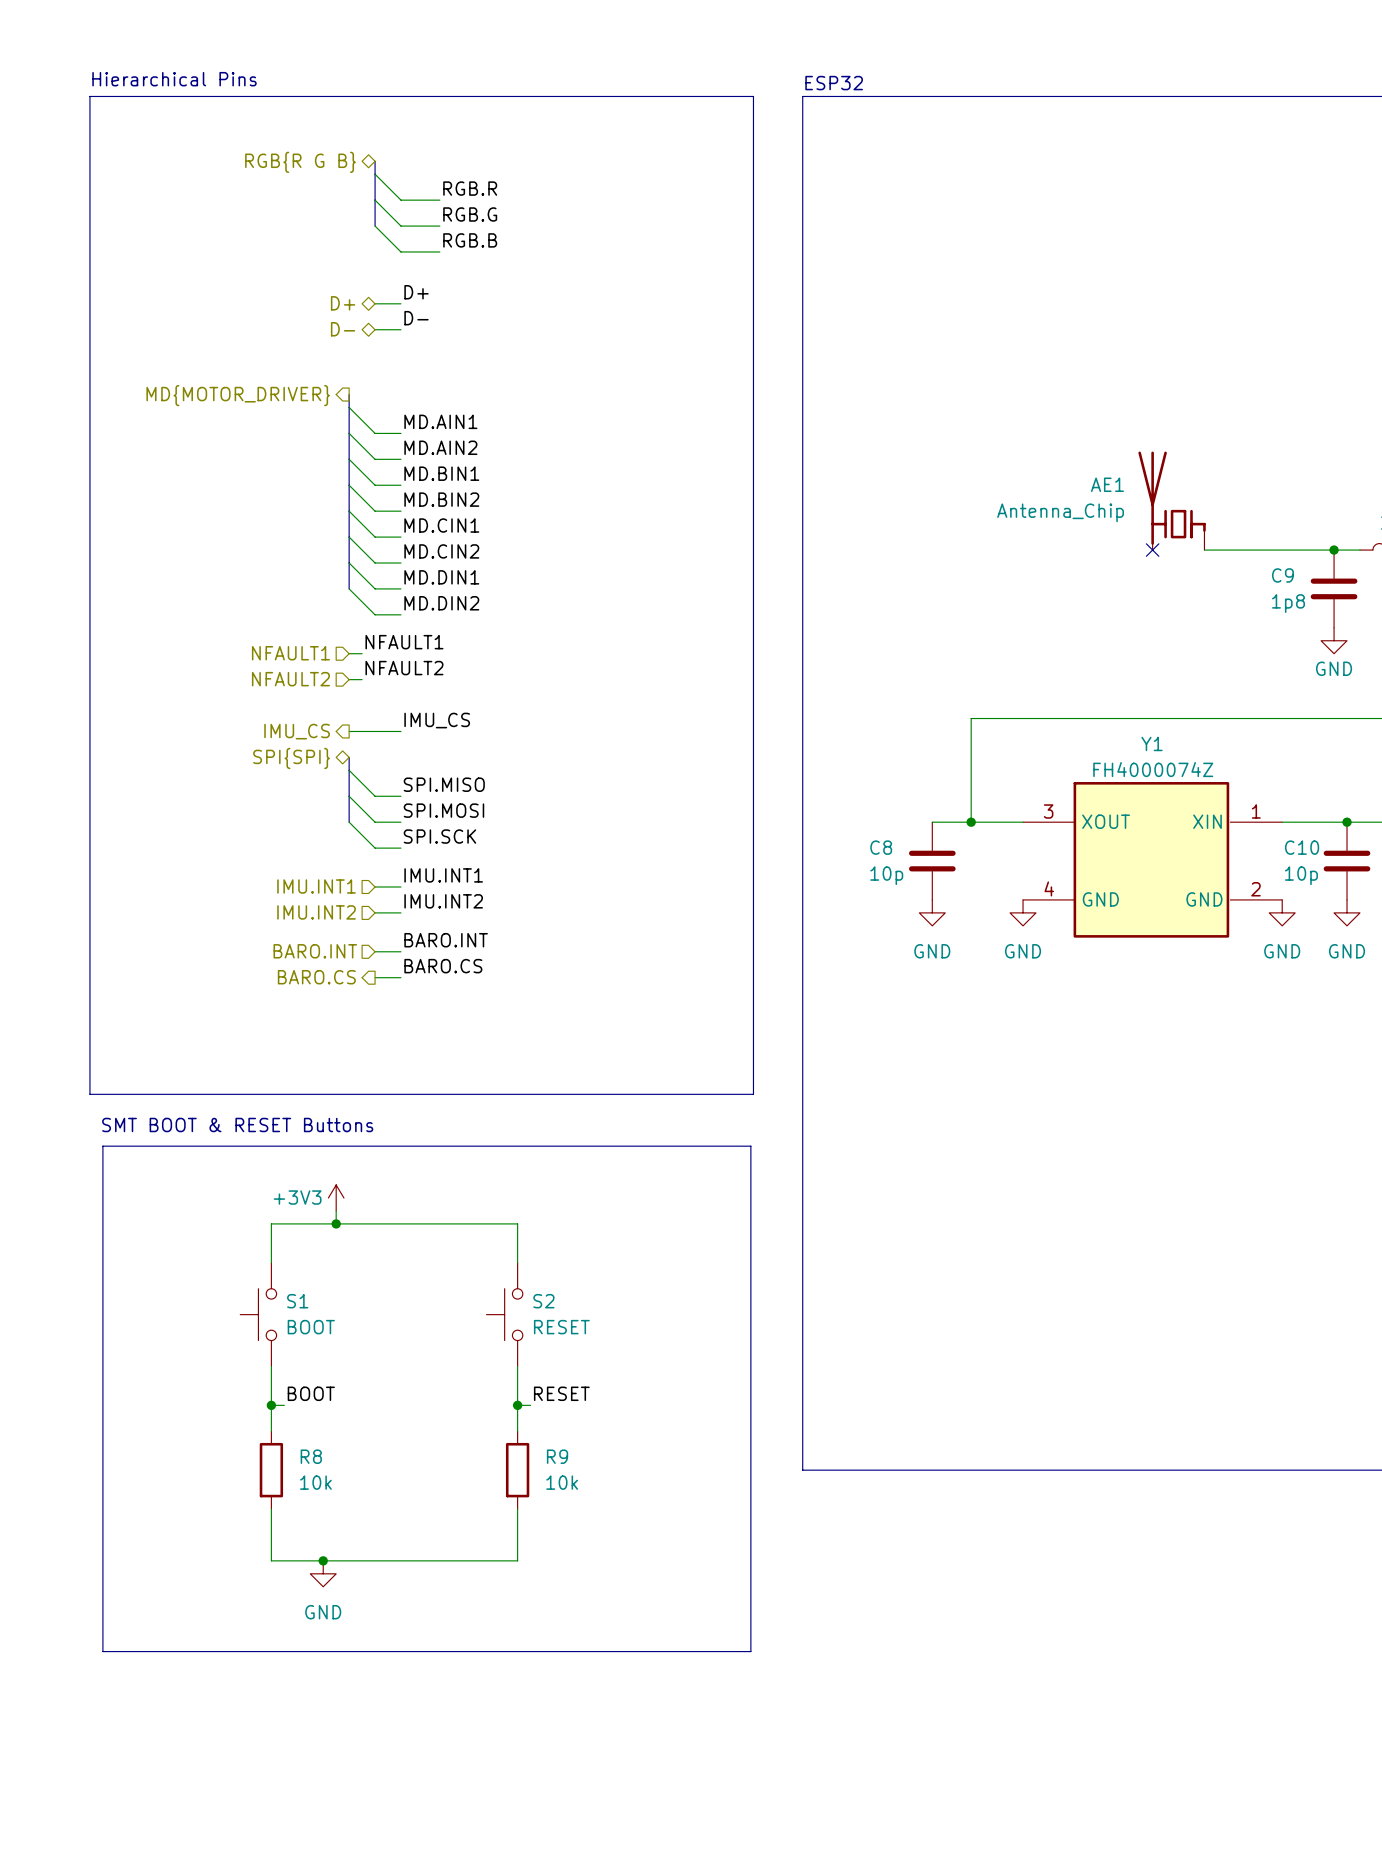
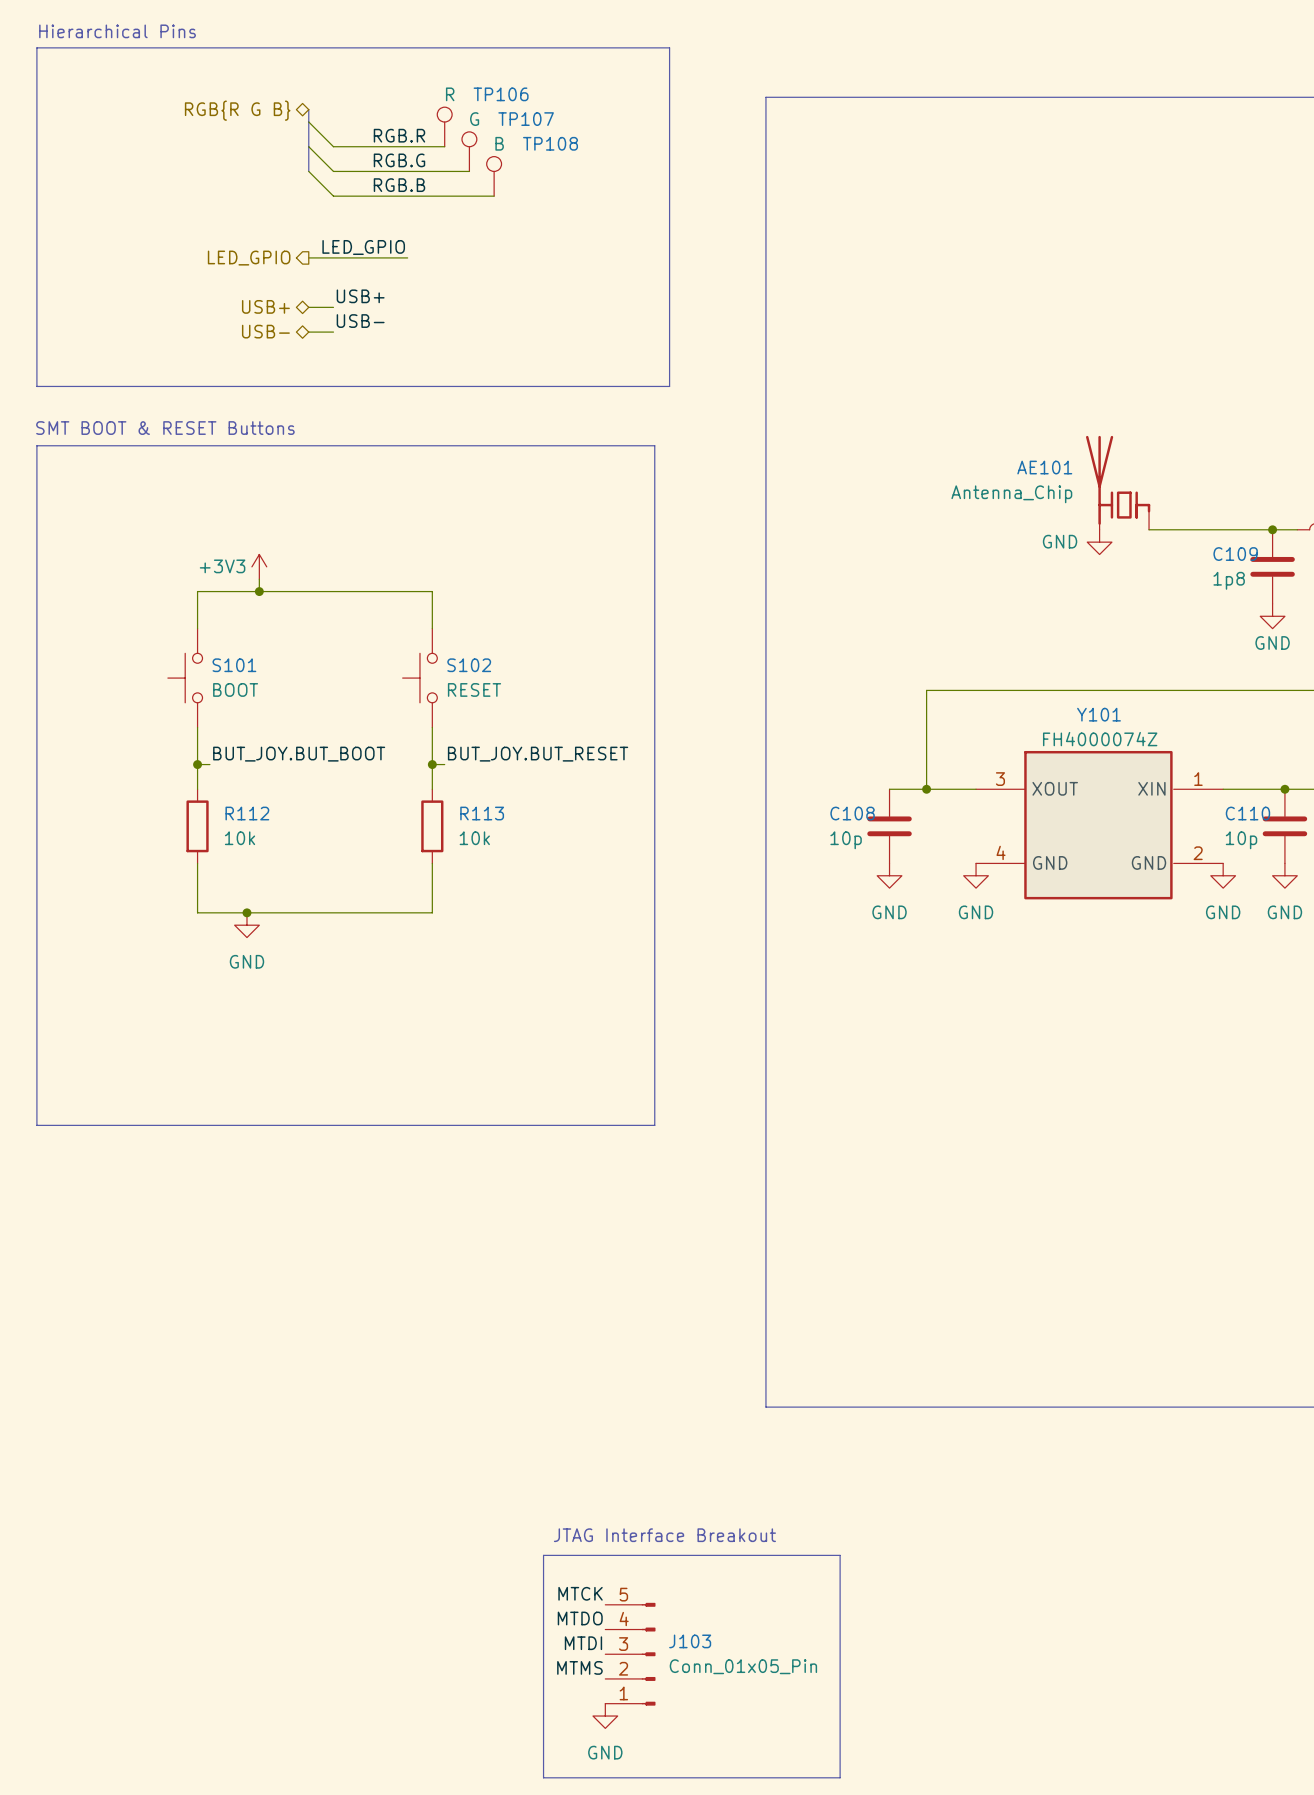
line: none -> (36, 47) (36, 386) (669, 386) (669, 47) (36, 47)
text position: Hierarchical Pins (174, 79) -> Hierarchical Pins (117, 31)
text: ESP32 (834, 83) -> none
line: (89, 96) (753, 96) (753, 1094) (89, 1094) (89, 96) -> (36, 445) (36, 1125) (654, 1125) (654, 445) (36, 445)
wire: none -> (308, 122) (333, 146) (444, 146)
TP106: none -> R (444, 126)
wire: none -> (308, 146) (333, 171) (469, 171)
TP107: none -> G (469, 151)
bus: (375, 161) (375, 226) -> (308, 109) (308, 171)
hierarchical label position: RGB{R G B} (300, 162) -> RGB{R G B} (237, 110)
wire: (375, 174) (400, 200) -> (308, 171) (333, 196) (382, 196)
TP108: none -> B (494, 176)
label position: RGB.R (470, 188) -> RGB.R (399, 135)
wire: (375, 200) (400, 226) (439, 226) -> none
wire: none -> (419, 196) (494, 196)
label position: RGB.G (470, 214) -> RGB.G (399, 160)
wire: (375, 226) (400, 251) (439, 251) -> none
label position: RGB.B (470, 240) -> RGB.B (399, 185)
label: none -> LED_GPIO (363, 247)
wire: none -> (308, 257) (407, 257)
hierarchical label: none -> LED_GPIO (249, 258)
label: D+ (416, 292) -> none
hierarchical label: D+ (343, 303) -> none
wire: (375, 303) (400, 303) -> (308, 307) (333, 307)
label: none -> USB+ (360, 296)
hierarchical label: none -> USB+ (265, 306)
label: D- (416, 318) -> none
hierarchical label: D- (343, 329) -> none
wire: (375, 329) (400, 329) -> (308, 332) (333, 332)
label: none -> USB- (360, 321)
hierarchical label: none -> USB- (265, 331)
bus: (349, 394) (349, 588) -> none
hierarchical label: MD{MOTOR_DRIVER} (238, 395) -> none
wire: (349, 407) (375, 433) (400, 433) -> none
label: MD.AIN1 (440, 421) -> none
wire: (349, 433) (375, 459) (400, 459) -> none
text: none -> SMT BOOT & RESET Buttons (165, 428)
label: MD.AIN2 (440, 447) -> none
wire: (349, 459) (375, 485) (400, 485) -> none
label: MD.BIN1 (441, 473) -> none
AE1 name: AE1 (1107, 484) -> AE101 (1044, 467)
wire: (349, 485) (375, 511) (400, 511) -> none
label: MD.BIN2 (441, 499) -> none
wire: (349, 511) (375, 537) (400, 537) -> none
label: MD.CIN1 (441, 525) -> none
wire: (349, 537) (375, 563) (400, 563) -> none
no-connect mark: (1152, 550) -> none
label: MD.CIN2 (441, 551) -> none
wire: (349, 563) (375, 588) (400, 588) -> none
power symbol: none -> GND (1099, 542)
C9 name: C9 (1282, 575) -> C109 (1235, 554)
label: MD.DIN1 (441, 577) -> none
power symbol: none -> +3V3 (259, 566)
wire: (349, 588) (375, 614) -> (197, 628) (197, 591) (358, 591)
wire: none -> (259, 579) (259, 591)
label: MD.DIN2 (441, 603) -> none
junction: none -> (259, 591)
wire: none -> (382, 591) (432, 591) (432, 628)
label: NFAULT1 (404, 642) -> none
hierarchical label: NFAULT1 (290, 653) -> none
wire: (349, 653) (362, 653) -> (197, 764) (209, 764)
label: NFAULT2 (404, 668) -> none
hierarchical label: NFAULT2 (290, 679) -> none
wire: (349, 679) (362, 679) -> (432, 764) (444, 764)
S101: none -> BOOT (185, 678)
S102: none -> RESET (419, 678)
label: IMU_CS (437, 720) -> none
hierarchical label: IMU_CS (297, 731) -> none
wire: (349, 731) (400, 731) -> none
Y1 name: Y1 (1152, 743) -> Y101 (1099, 714)
wire: none -> (197, 727) (197, 789)
bus: (349, 757) (349, 822) -> none
wire: none -> (432, 727) (432, 789)
hierarchical label: SPI{SPI} (291, 758) -> none
wire: (349, 770) (375, 796) (400, 796) -> none
label: SPI.MISO (444, 784) -> none
label: none -> BUT_JOY.BUT_BOOT (299, 754)
label: none -> BUT_JOY.BUT_RESET (538, 754)
junction: none -> (197, 764)
wire: (349, 796) (375, 822) (400, 822) -> none
junction: none -> (432, 764)
label: SPI.MOSI (443, 810) -> none
wire: (349, 822) (375, 848) (400, 848) -> none
label: SPI.SCK (439, 836) -> none
C8 name: C8 (881, 847) -> C108 (852, 813)
C10 name: C10 (1302, 847) -> C110 (1247, 813)
R112: none -> 10k (197, 826)
R113: none -> 10k (432, 826)
label: IMU.INT1 (443, 875) -> none
hierarchical label: IMU.INT1 (316, 886) -> none
wire: (375, 886) (400, 886) -> none
wire: none -> (197, 863) (197, 912) (358, 912)
wire: none -> (432, 863) (432, 912) (382, 912)
label: IMU.INT2 (443, 901) -> none
hierarchical label: IMU.INT2 (316, 912) -> none
wire: (375, 912) (400, 912) -> none
label: BARO.INT (446, 940) -> none
junction: none -> (246, 912)
hierarchical label: BARO.INT (315, 951) -> none
power symbol: none -> GND (246, 925)
label: BARO.CS (443, 966) -> none
hierarchical label: BARO.CS (316, 977) -> none
wire: (375, 977) (400, 977) -> none
text: SMT BOOT & RESET Buttons (237, 1124) -> none
line: (102, 1146) (750, 1146) (750, 1651) (102, 1651) (102, 1146) -> none
power symbol: +3V3 (336, 1198) -> none
wire: (336, 1210) (336, 1223) -> none
junction: (336, 1223) -> none
wire: (271, 1262) (271, 1223) (517, 1223) (517, 1262) -> none
S1: BOOT (258, 1314) -> none
S2: RESET (504, 1314) -> none
wire: (271, 1366) (271, 1431) -> none
wire: (517, 1366) (517, 1431) -> none
label: BOOT (311, 1393) -> none
label: RESET (561, 1393) -> none
wire: (271, 1405) (284, 1405) -> none
junction: (271, 1405) -> none
wire: (517, 1405) (530, 1405) -> none
junction: (517, 1405) -> none
R8: 10k (271, 1470) -> none
R9: 10k (517, 1470) -> none
wire: (271, 1509) (271, 1560) (517, 1560) (517, 1509) -> none
junction: (323, 1560) -> none
power symbol: GND (323, 1573) -> none
text: none -> JTAG Interface Breakout (664, 1535)
line: none -> (543, 1555) (840, 1555) (840, 1777) (543, 1777) (543, 1555)
label: none -> MTCK (580, 1593)
label: none -> MTDO (580, 1618)
label: none -> MTDI (583, 1643)
J103: none -> Conn_01x05_Pin (630, 1654)
label: none -> MTMS (579, 1667)
power symbol: none -> GND (605, 1716)

